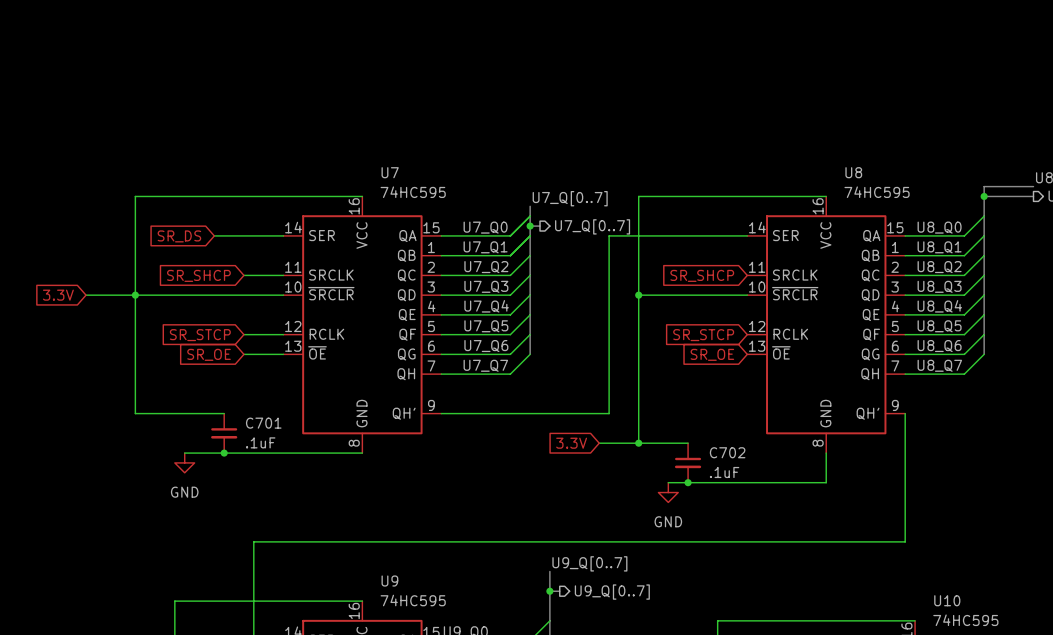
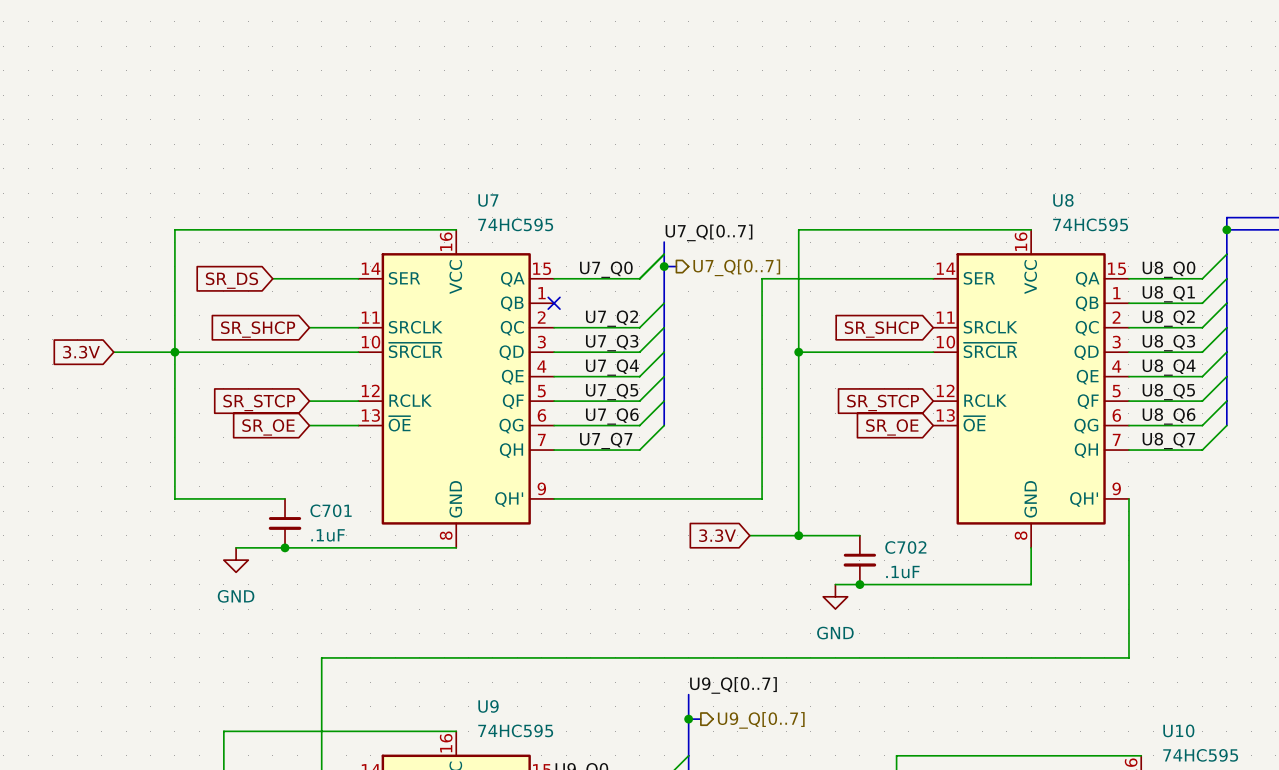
wire: (530, 235) (510, 255) (441, 255) -> none
label: U7_Q1 (485, 247) -> none
no-connect mark: none -> (554, 303)

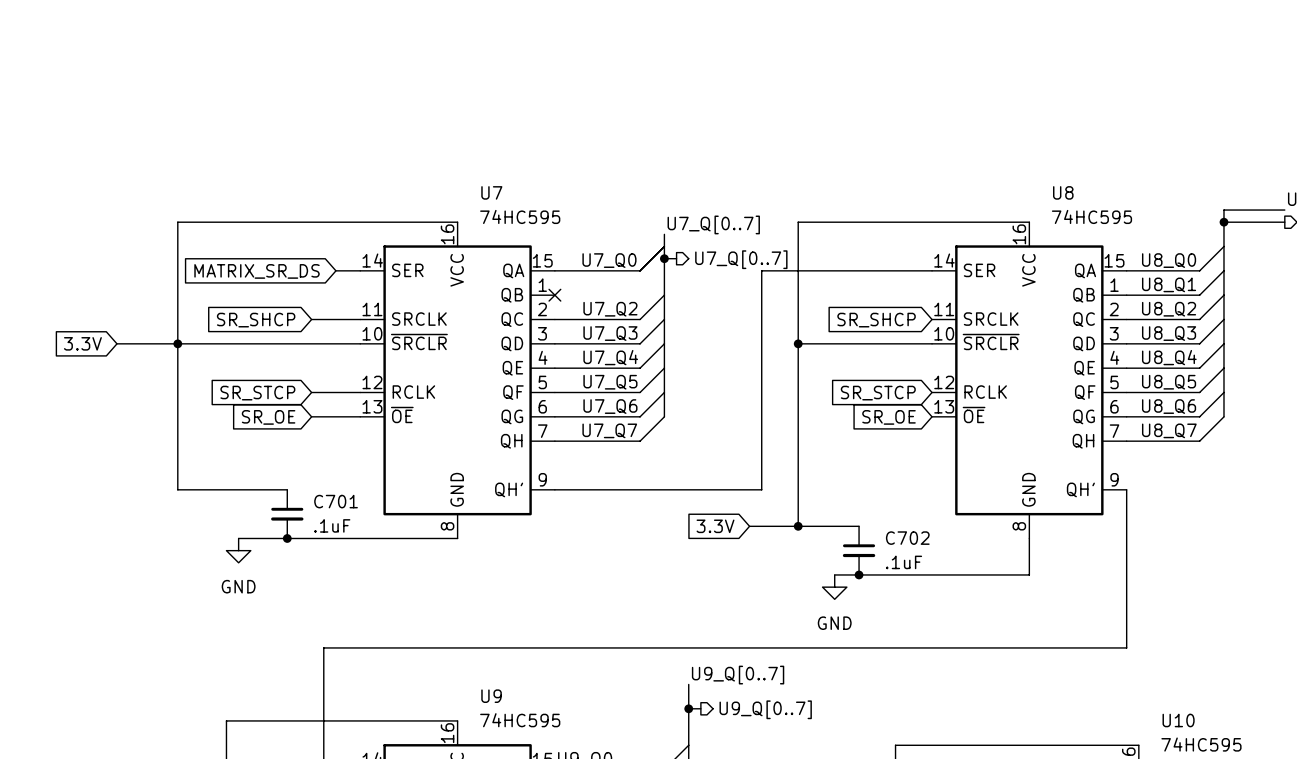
wire: (272, 278) (333, 278) -> none
global label: SR_DS (231, 280) -> none
global label: none -> MATRIX_SR_DS (257, 271)

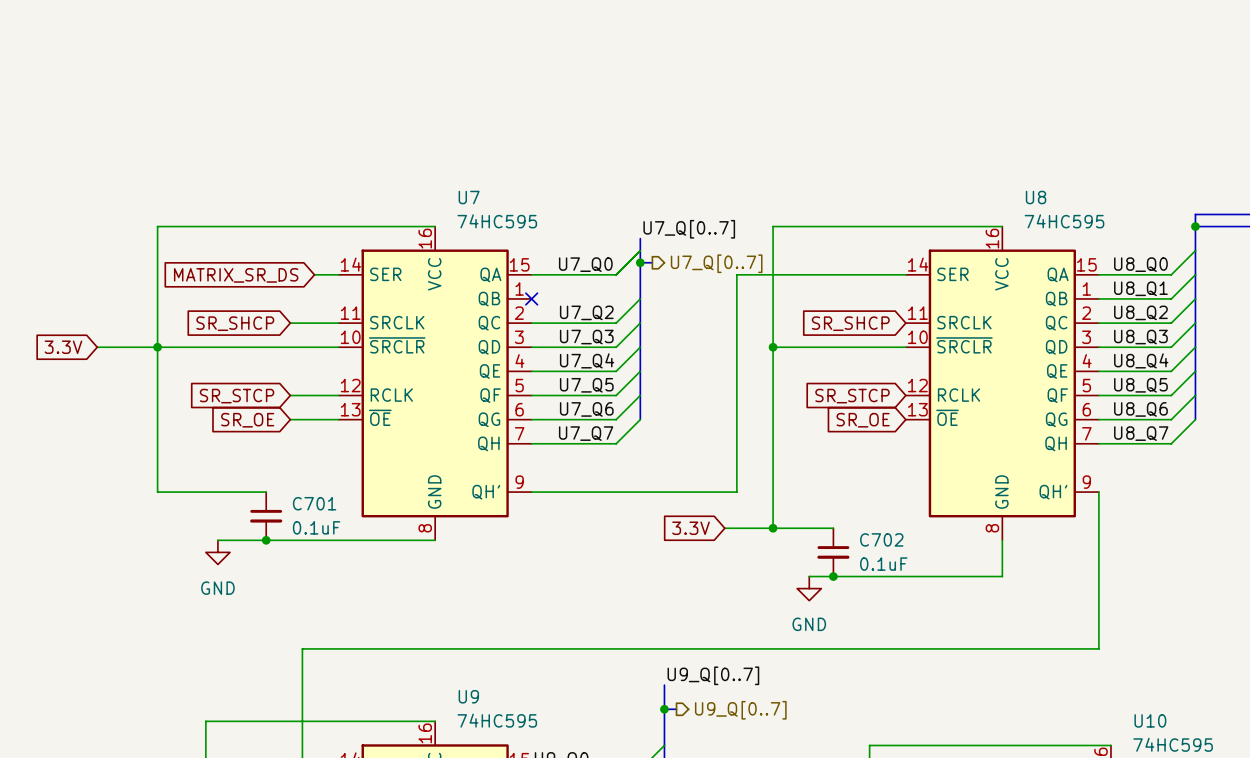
C701 value: .1uF (332, 525) -> 0.1uF (316, 527)
C702 value: .1uF (904, 562) -> 0.1uF (883, 564)

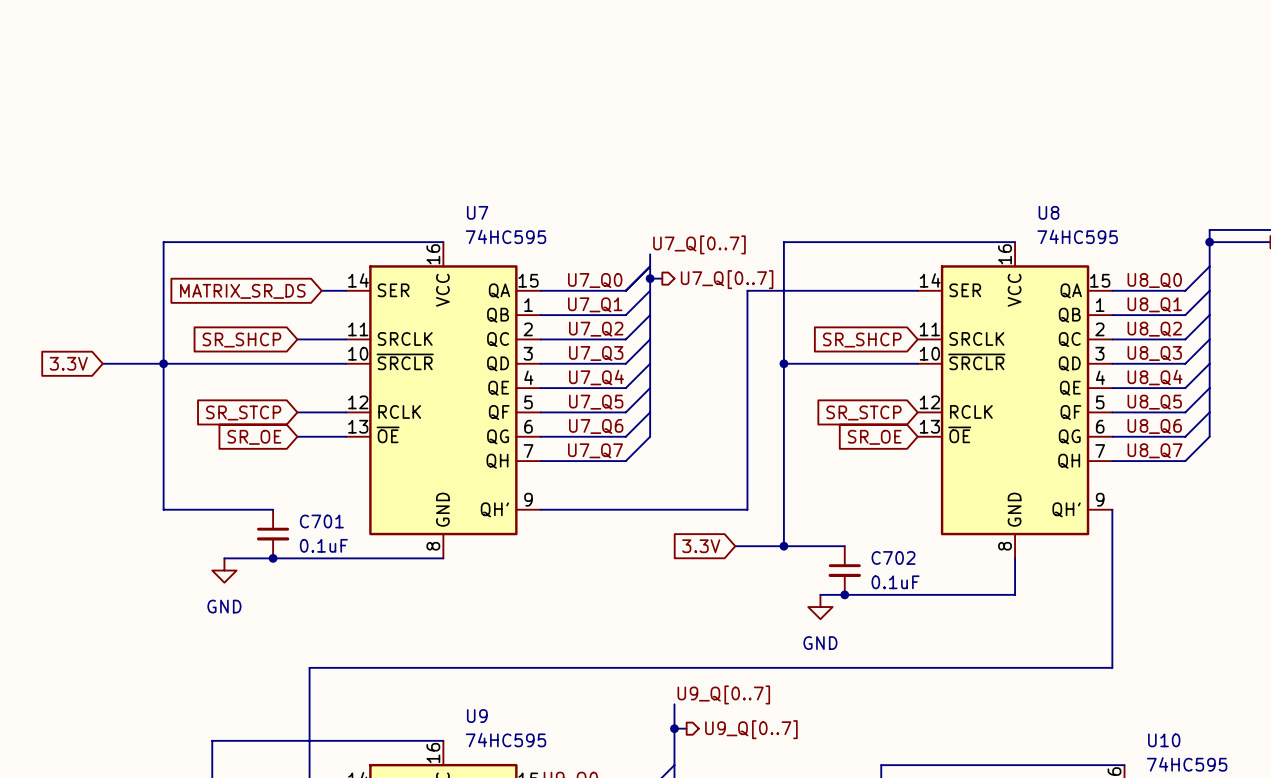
wire: none -> (650, 290) (625, 315) (540, 315)
label: none -> U7_Q1 (595, 304)
no-connect mark: (531, 298) -> none

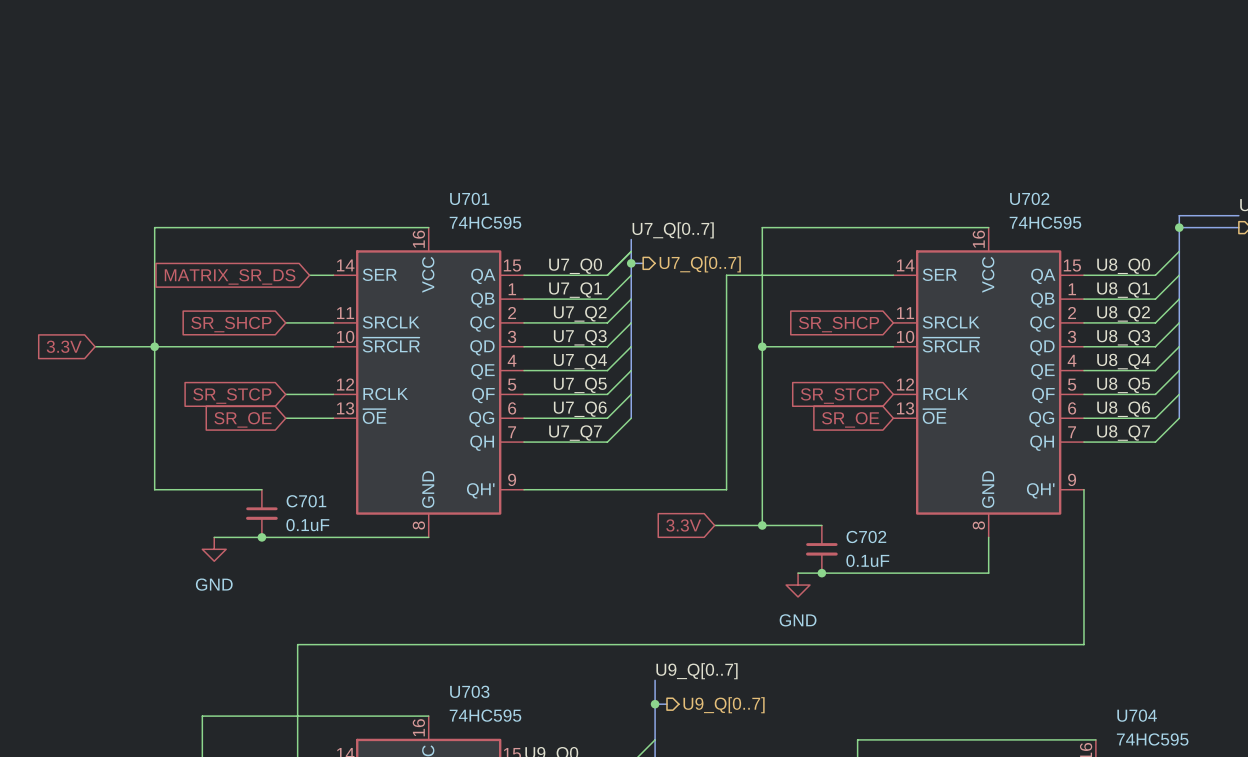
U7 name: U7 (477, 212) -> U701 (469, 198)
U8 name: U8 (1048, 212) -> U702 (1029, 198)
U9 name: U9 (477, 716) -> U703 (469, 691)
U10 name: U10 (1164, 740) -> U704 (1137, 715)

